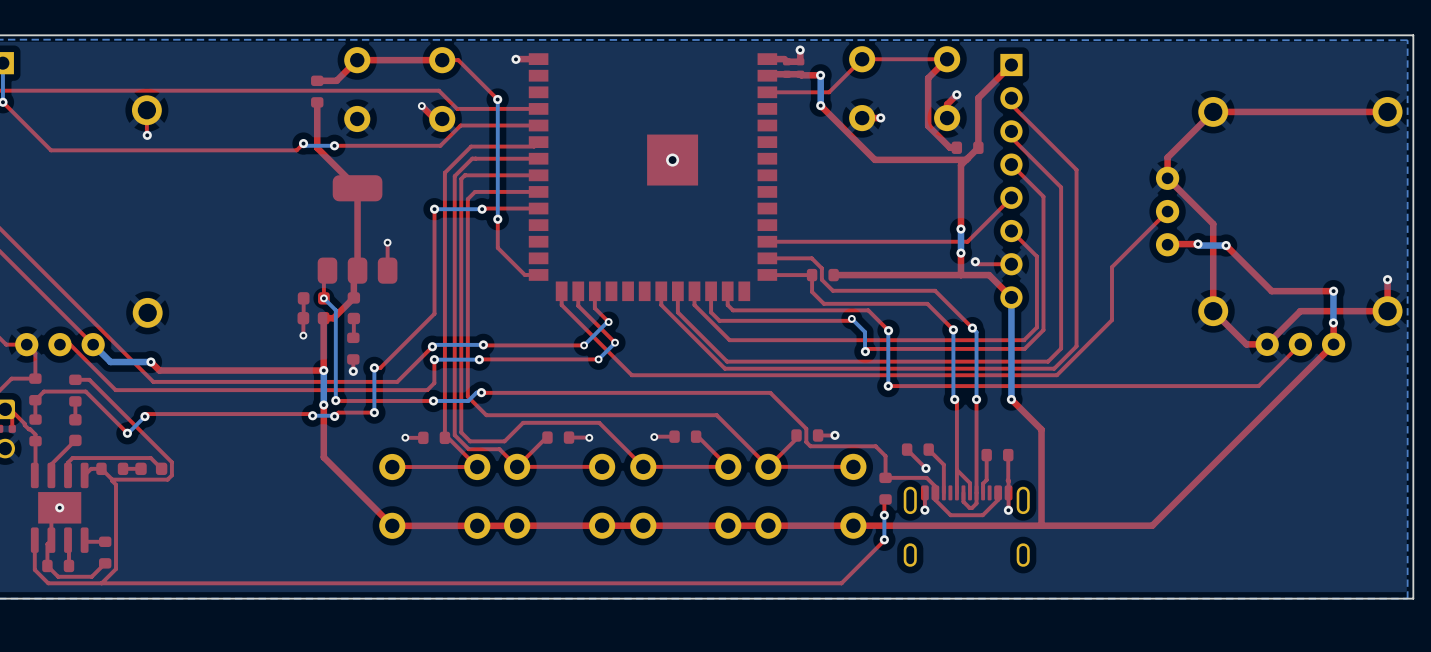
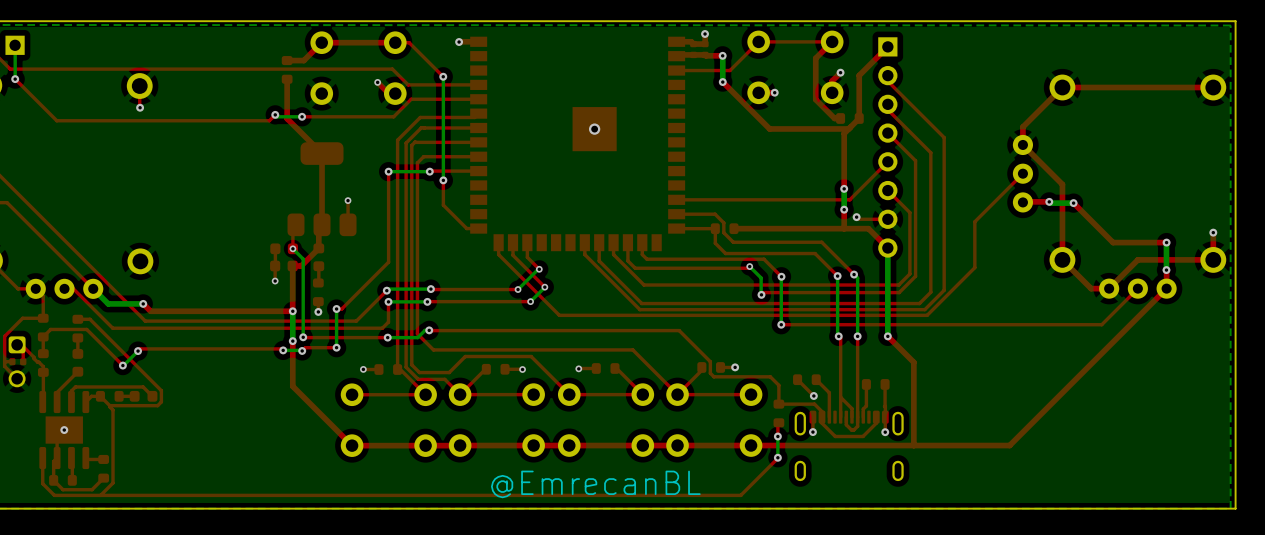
text: none -> @EmrecanBL (595, 484)

